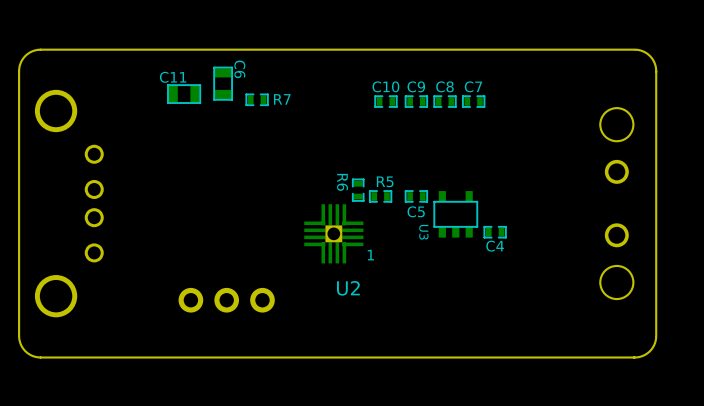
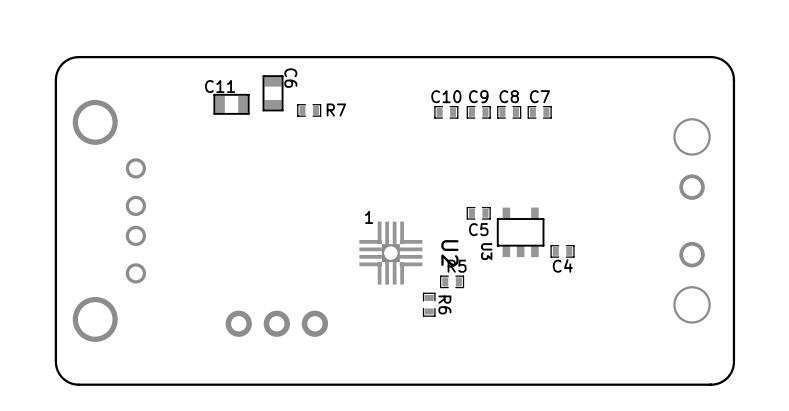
R6 name position: R6 (342, 182) -> R6 (444, 304)
R6 position: (358, 190) -> (429, 304)
R5 position: (380, 196) -> (452, 281)
U2 text position: 1 (370, 255) -> 1 (369, 217)
U2 name rotation: 0° (348, 288) -> 90° clockwise (449, 253)
U2 name position: U2 (348, 288) -> U2 (449, 253)

